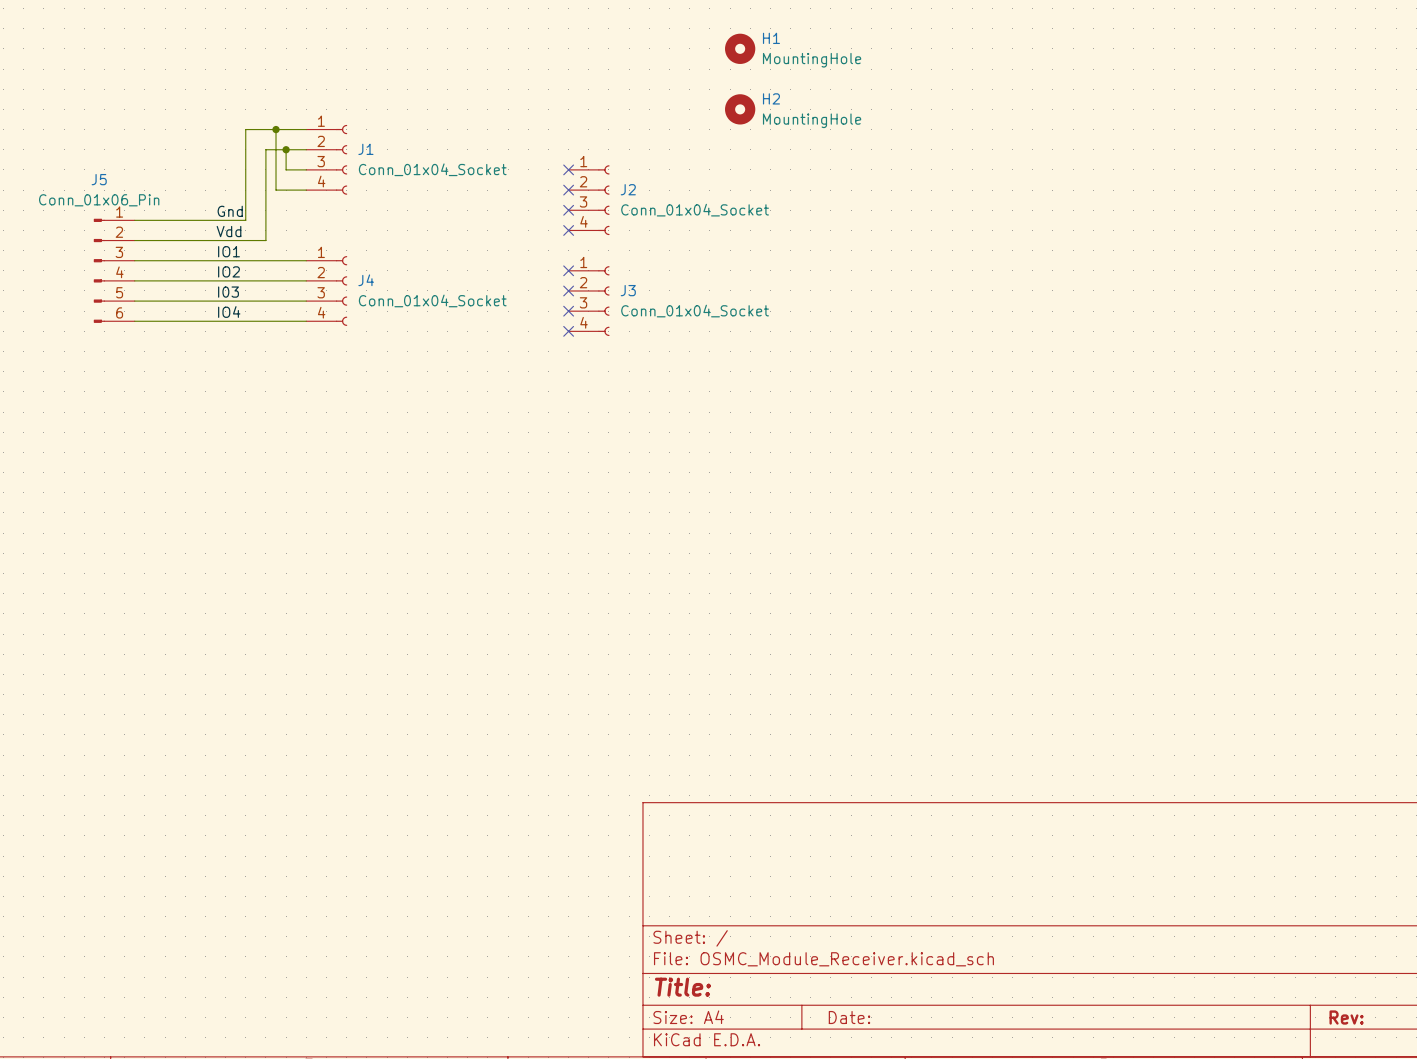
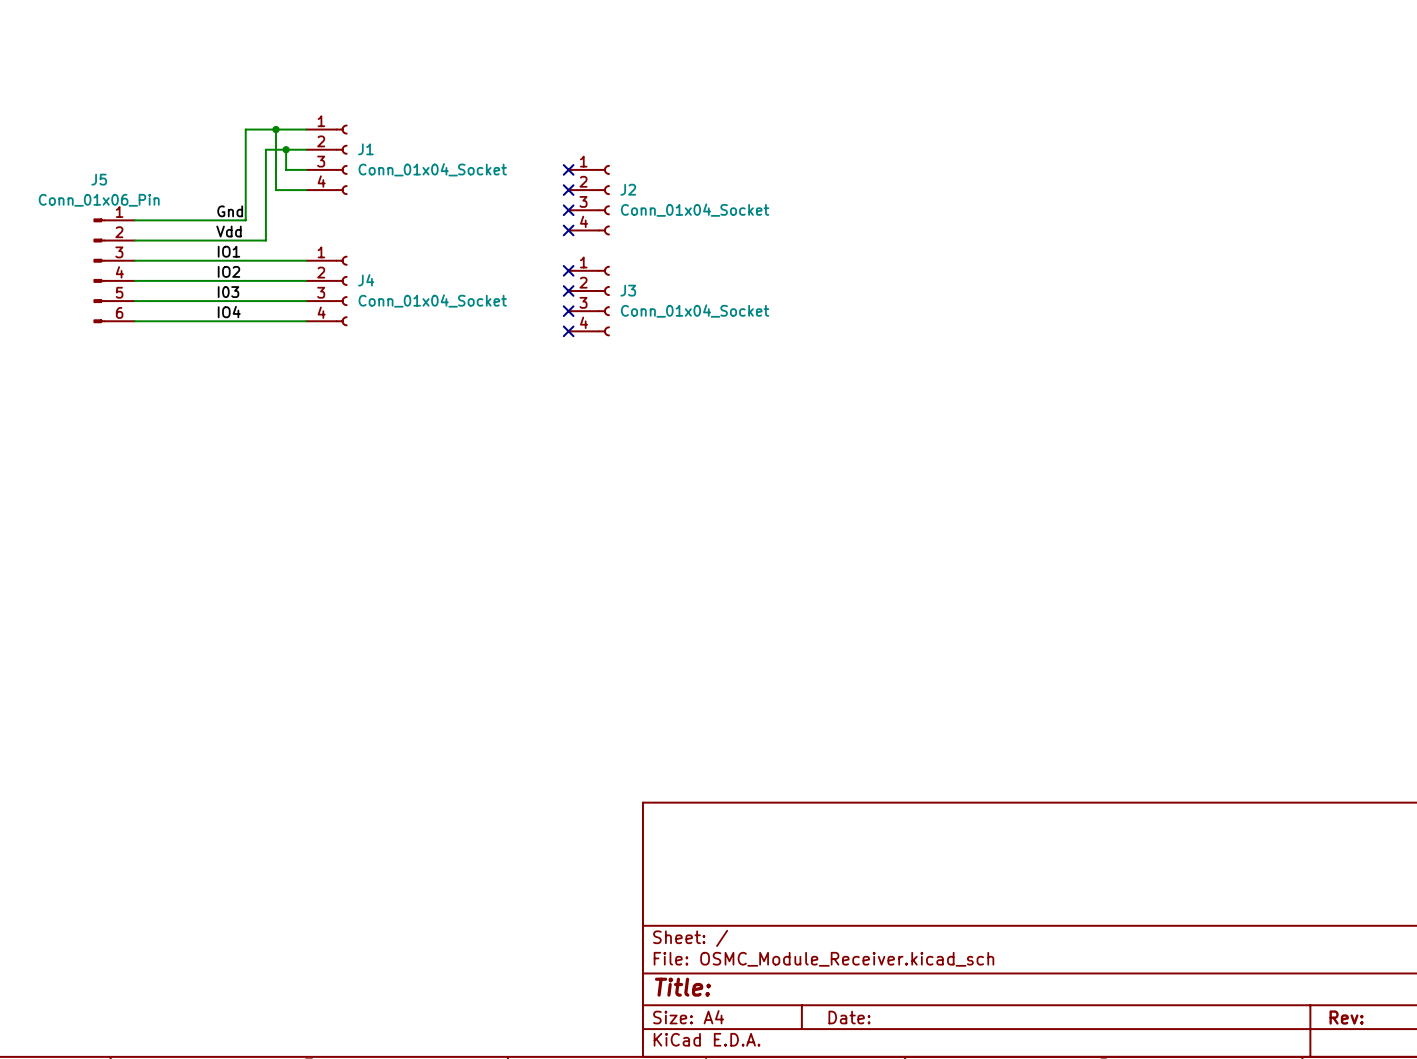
H1: MountingHole (740, 48) -> none
H2: MountingHole (740, 109) -> none

